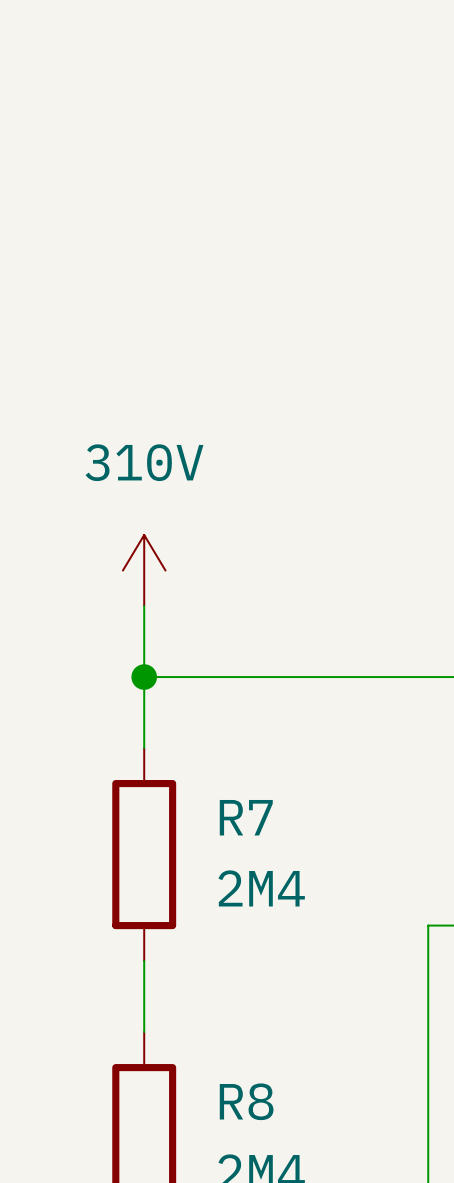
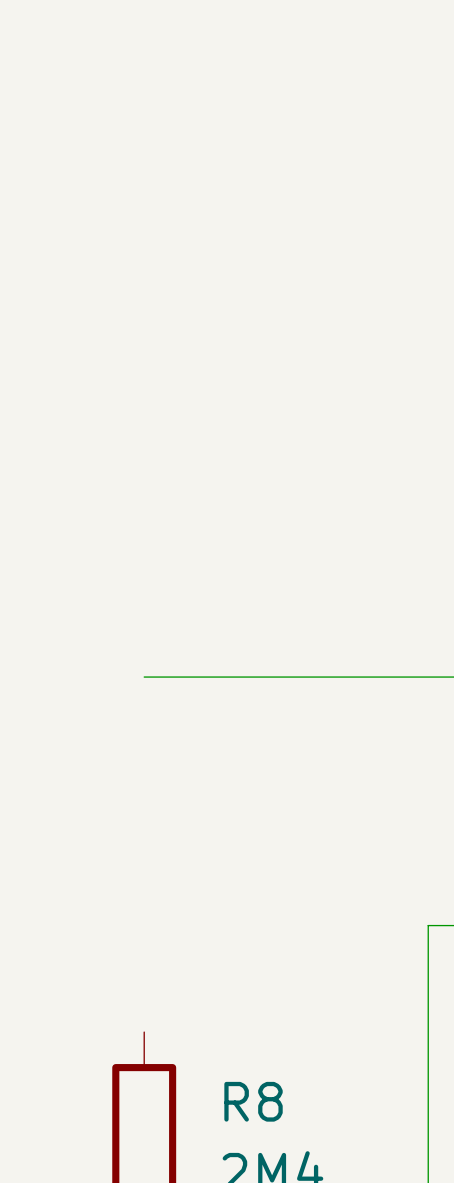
power symbol: 310V (144, 570) -> none
wire: (144, 606) (144, 748) -> none
junction: (144, 677) -> none
R7: 2M4 (144, 854) -> none
wire: (144, 961) (144, 1032) -> none

